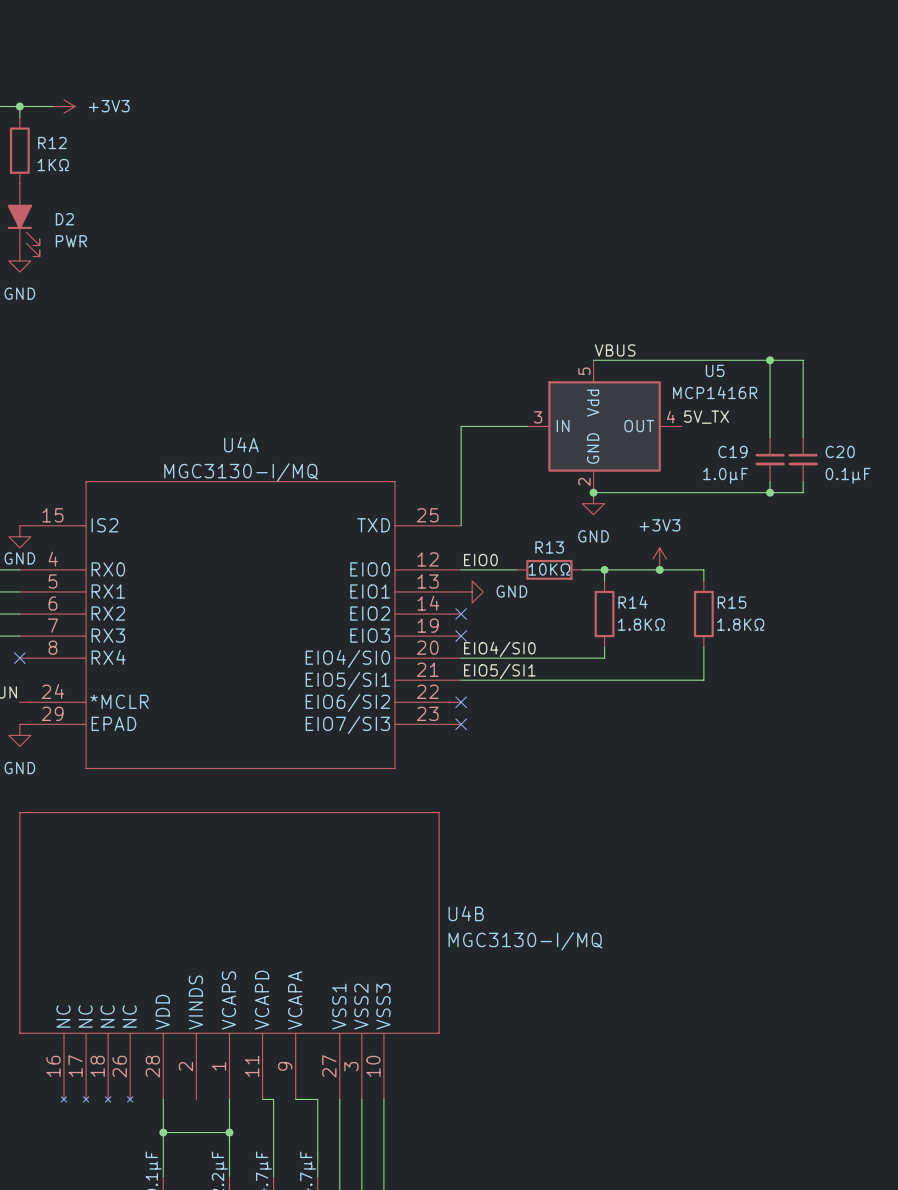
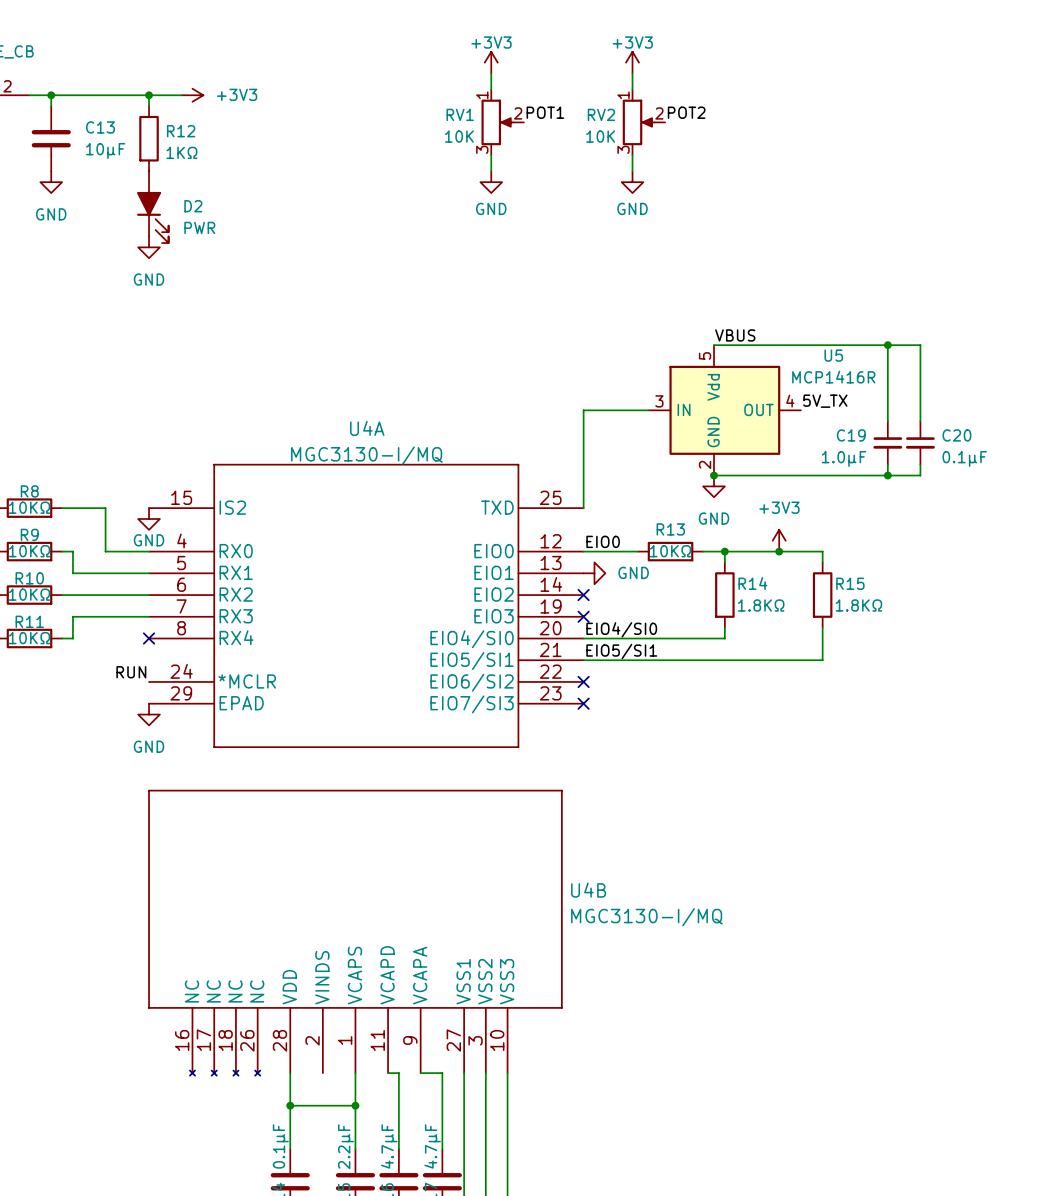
power symbol: none -> +3V3 (491, 62)
power symbol: none -> +3V3 (632, 62)
wire: none -> (491, 73) (491, 89)
wire: none -> (632, 73) (632, 89)
label: none -> POT1 (545, 112)
label: none -> POT2 (686, 112)
RV1: none -> 10K (502, 122)
RV2: none -> 10K (643, 122)
wire: none -> (491, 155) (491, 171)
wire: none -> (632, 155) (632, 171)
power symbol: none -> GND (491, 182)
power symbol: none -> GND (632, 182)

